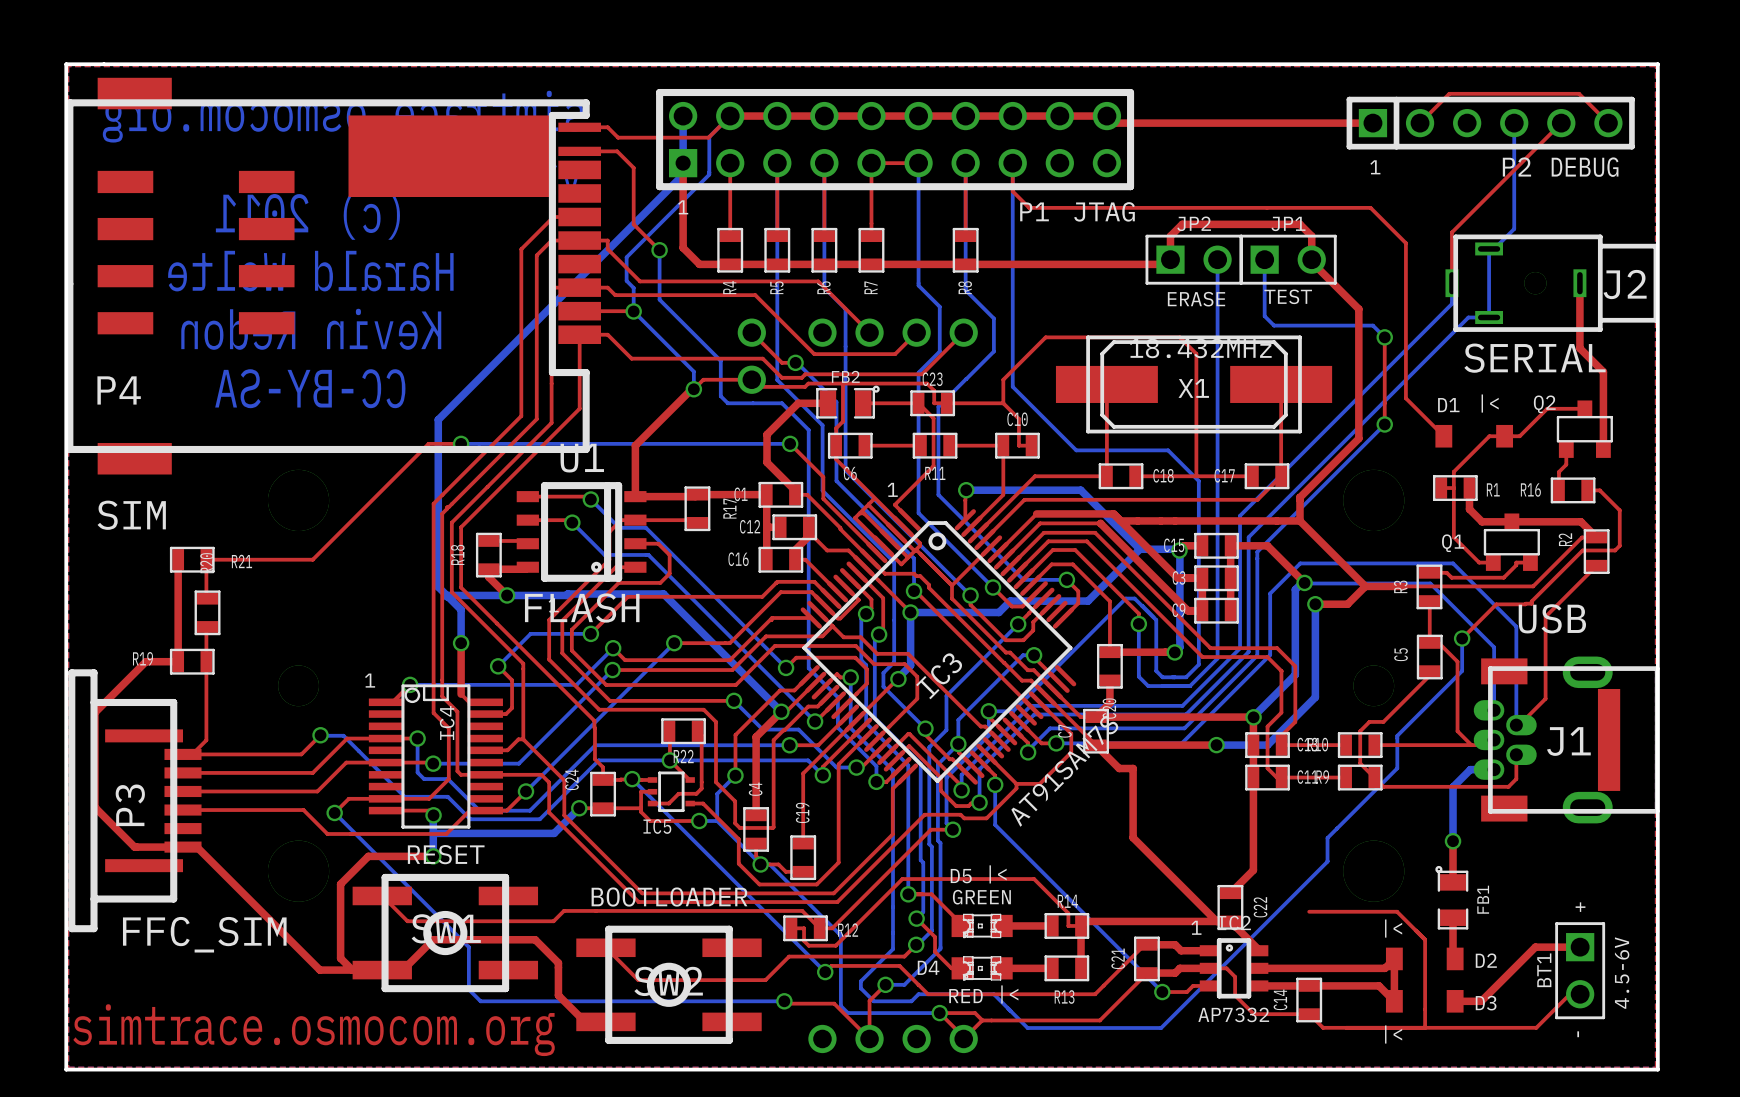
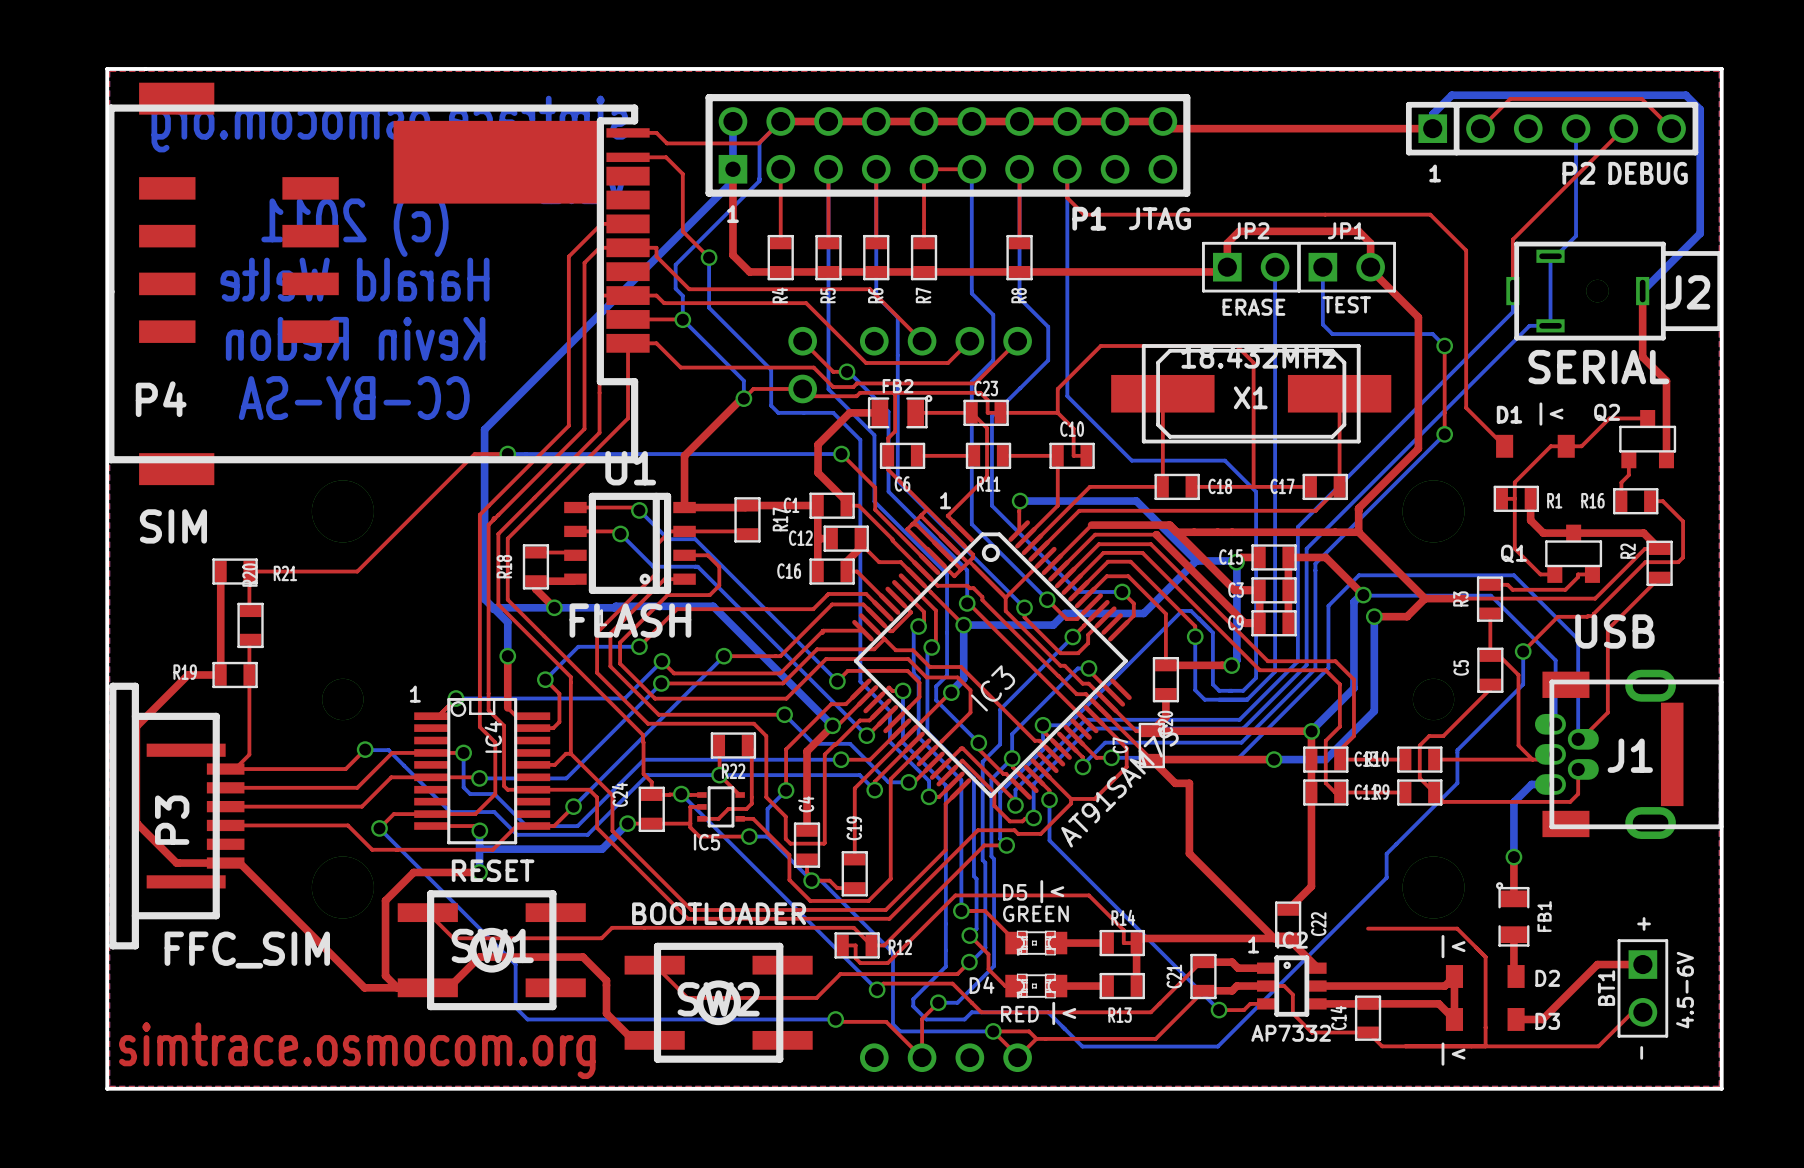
bottom track: none -> (1432, 128) (1432, 114) (1451, 95) (1685, 95) (1700, 109) (1700, 233) (1642, 291)

